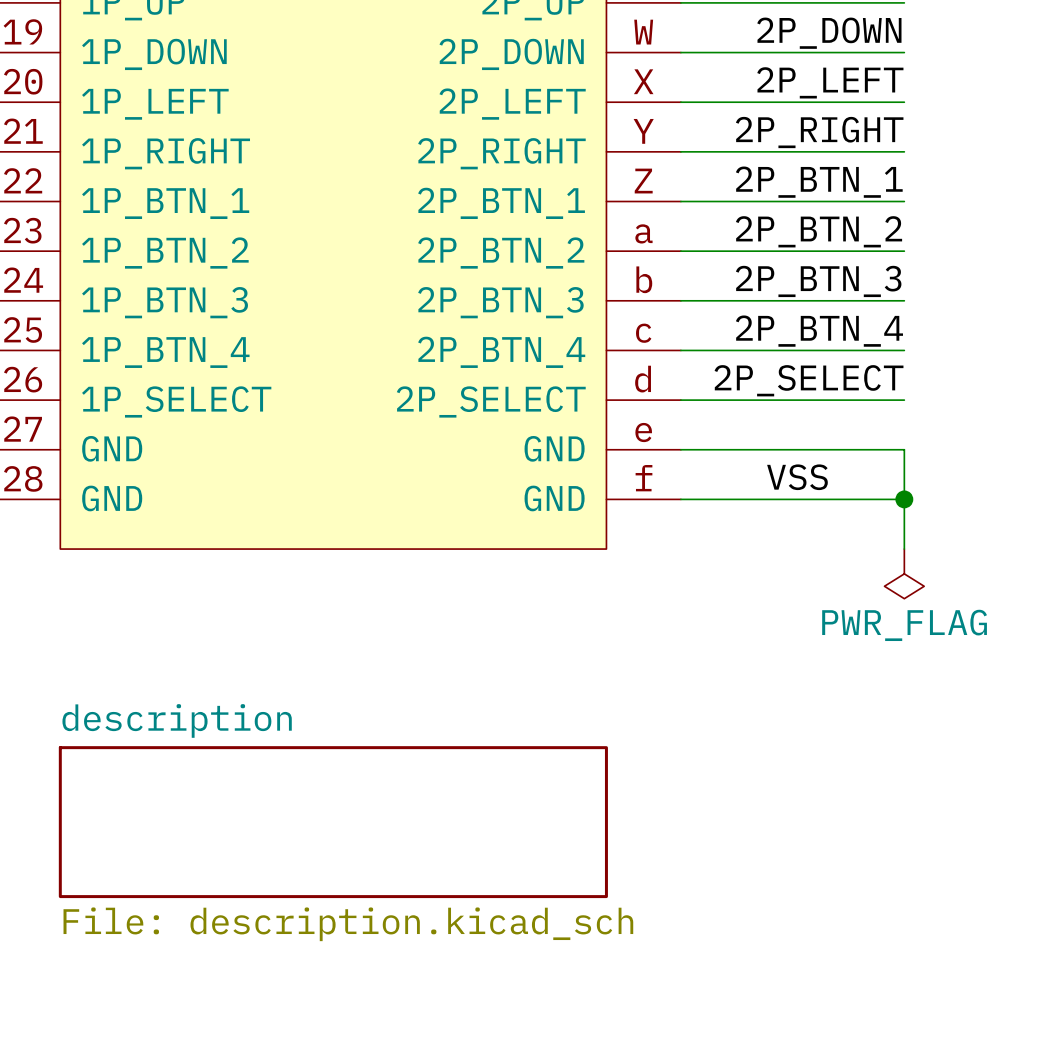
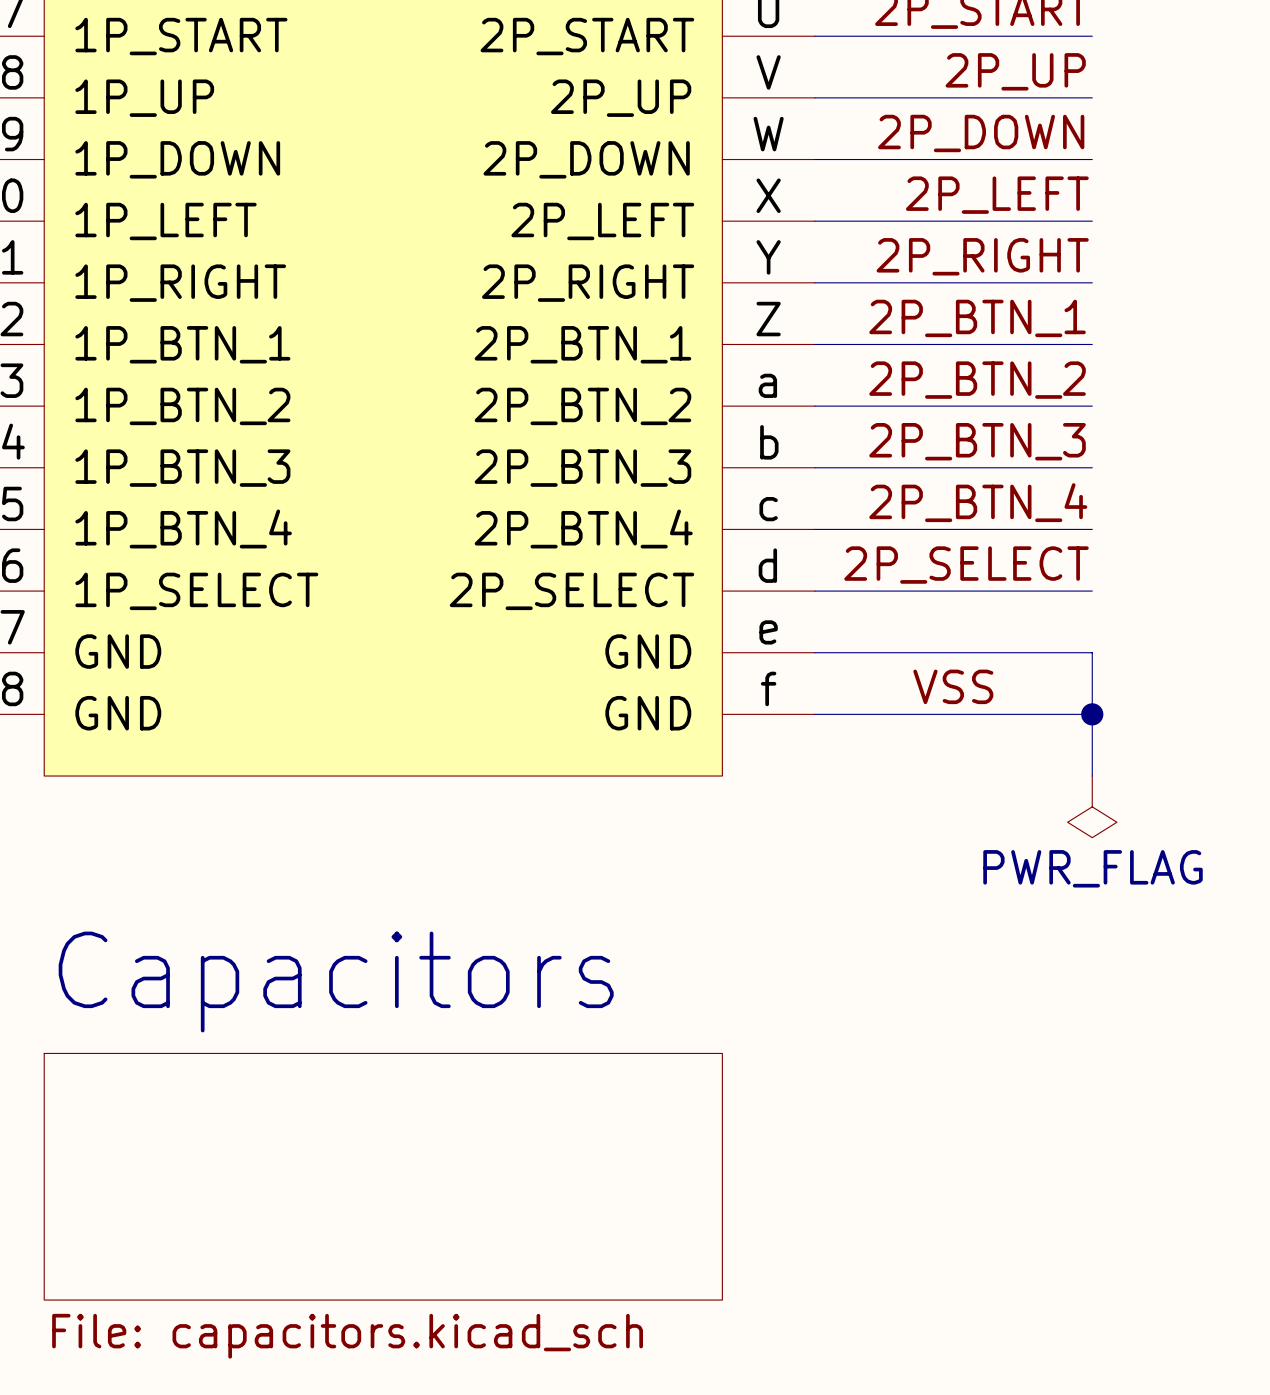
sheet description: File: description.kicad_sch (333, 822) -> none
sheet Capacitors: none -> File: capacitors.kicad_sch (383, 1176)

